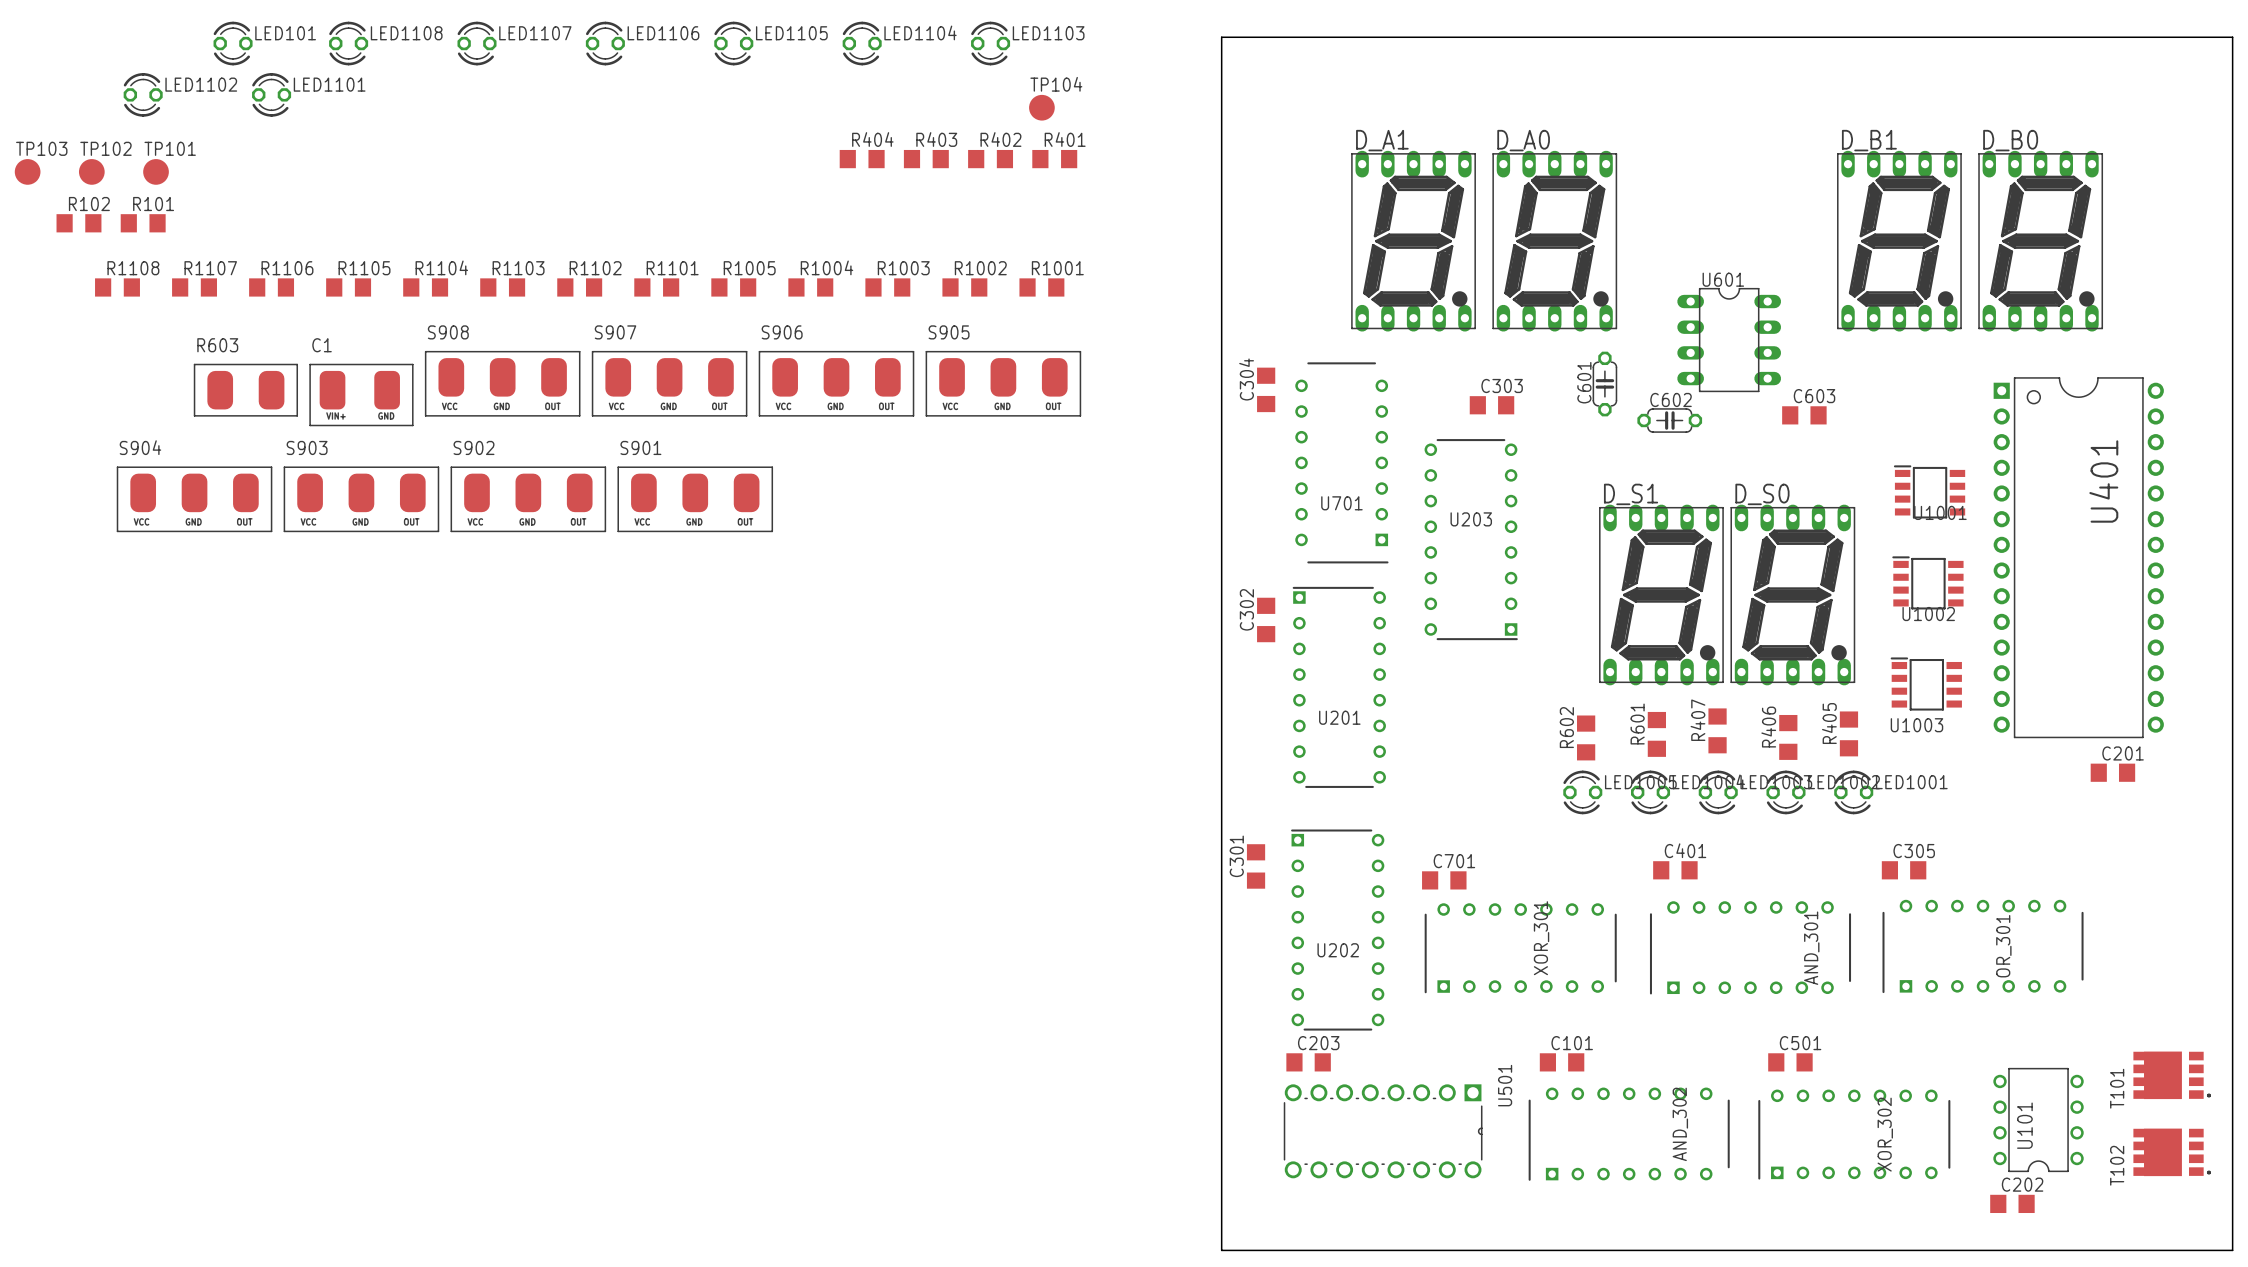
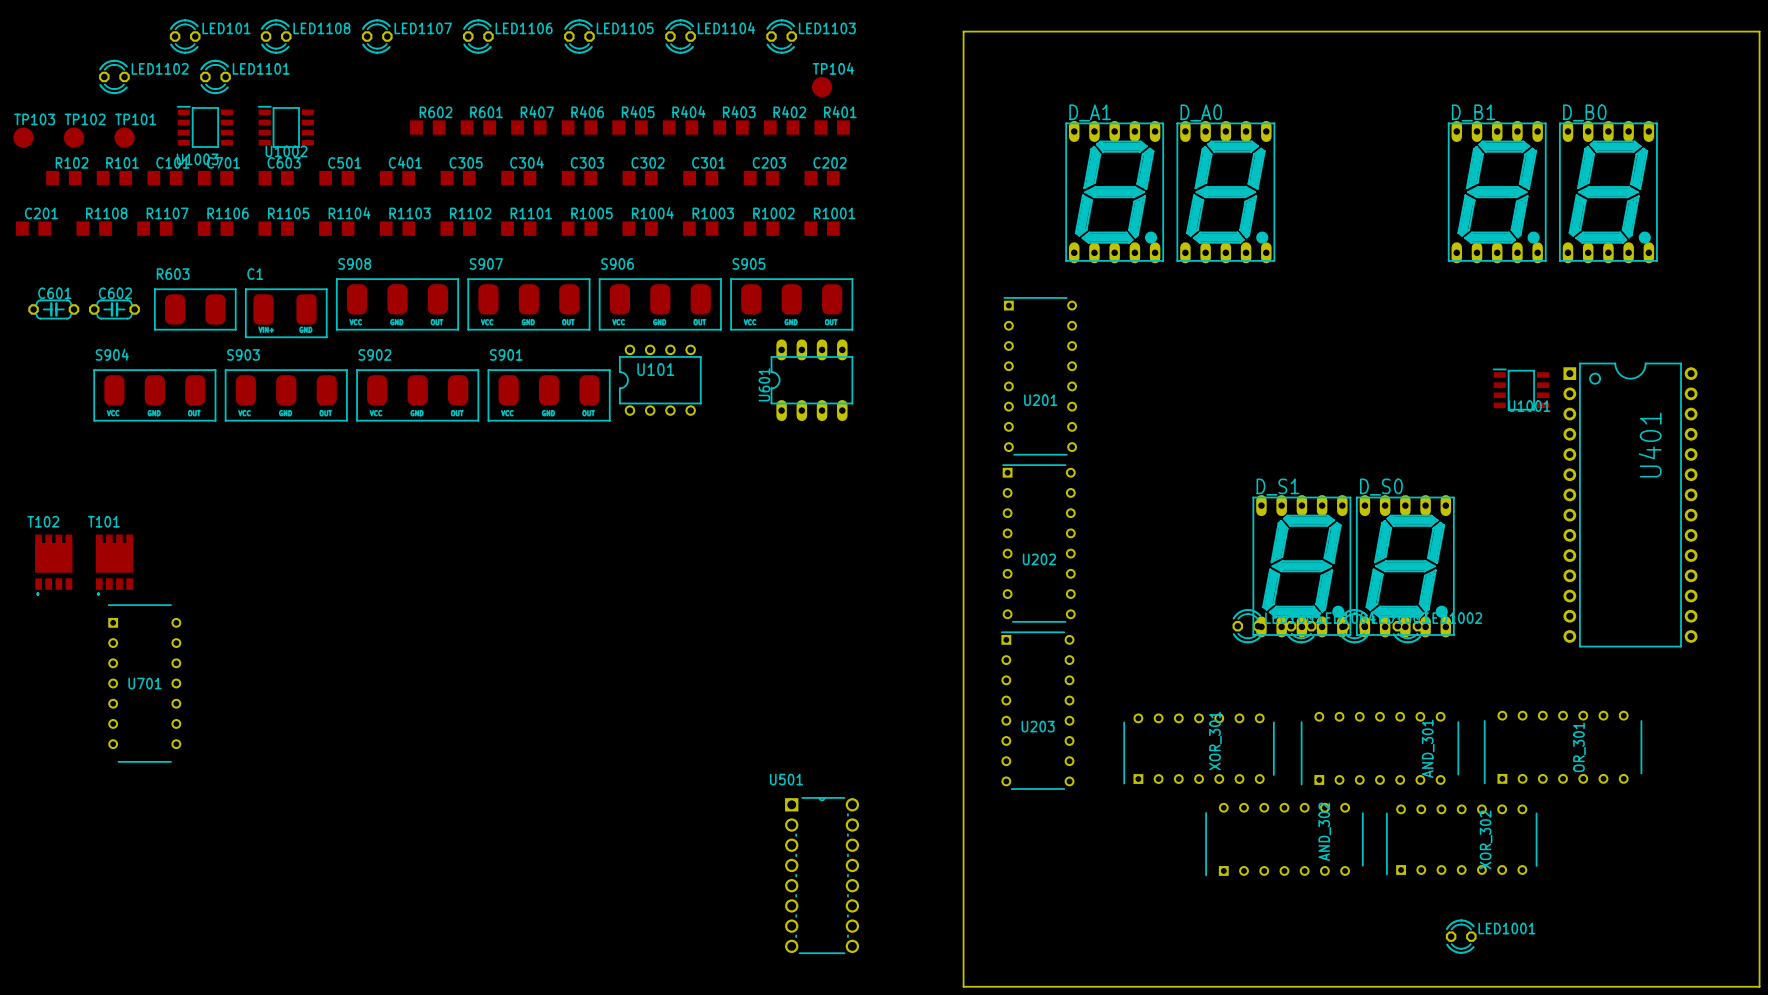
U601 rotation: 0° (1729, 340) -> 90° counterclockwise (811, 380)
U601 position: (1729, 340) -> (811, 380)
C601 rotation: 0° (1604, 384) -> 90° clockwise (53, 309)
C601 position: (1604, 384) -> (53, 309)
C304 rotation: 0° (1266, 389) -> 90° clockwise (518, 178)
C304 position: (1266, 389) -> (518, 178)
C303 position: (1492, 405) -> (579, 178)
C603 position: (1804, 415) -> (276, 178)
C602 position: (1669, 420) -> (114, 309)
U701 rotation: 0° (1341, 462) -> 180° (144, 683)
U701 position: (1341, 462) -> (144, 683)
U701 name position: U701 (1341, 503) -> U701 (144, 683)
U203 rotation: 0° (1471, 539) -> 180° (1037, 710)
U203 position: (1471, 539) -> (1037, 710)
U401 position: (2078, 557) -> (1630, 505)
U1002 position: (1927, 582) -> (285, 126)
D_S1 position: (1661, 595) -> (1301, 566)
D_S0 position: (1792, 595) -> (1405, 566)
C302 rotation: 0° (1266, 619) -> 90° clockwise (640, 178)
C302 position: (1266, 619) -> (640, 178)
U1003 position: (1926, 683) -> (205, 126)
U201 position: (1339, 687) -> (1040, 376)
R407 rotation: 0° (1717, 730) -> 90° clockwise (528, 127)
R407 position: (1717, 730) -> (528, 127)
R405 rotation: 0° (1848, 733) -> 90° clockwise (629, 127)
R405 position: (1848, 733) -> (629, 127)
R601 rotation: 0° (1656, 734) -> 90° clockwise (478, 127)
R601 position: (1656, 734) -> (478, 127)
R602 rotation: 0° (1586, 737) -> 90° clockwise (427, 127)
R602 position: (1586, 737) -> (427, 127)
R406 rotation: 0° (1788, 737) -> 90° clockwise (579, 127)
R406 position: (1788, 737) -> (579, 127)
C201 position: (2112, 772) -> (33, 228)
LED1001 position: (1853, 792) -> (1461, 936)
C301 rotation: 0° (1256, 866) -> 90° clockwise (700, 178)
C301 position: (1256, 866) -> (700, 178)
C401 position: (1675, 870) -> (397, 178)
C305 position: (1904, 870) -> (458, 178)
C701 position: (1444, 880) -> (215, 178)
U202 position: (1337, 930) -> (1039, 543)
C203 position: (1308, 1062) -> (761, 178)
C101 position: (1562, 1062) -> (164, 178)
C501 position: (1790, 1062) -> (336, 178)
T101 rotation: 0° (2172, 1075) -> 90° clockwise (114, 565)
T101 position: (2172, 1075) -> (114, 565)
U101 rotation: 0° (2038, 1119) -> 90° clockwise (660, 380)
U101 position: (2038, 1119) -> (660, 380)
U501 rotation: 0° (1383, 1131) -> 90° counterclockwise (822, 875)
U501 position: (1383, 1131) -> (822, 875)
AND_302 position: (1629, 1134) -> (1284, 839)
XOR_302 position: (1854, 1134) -> (1461, 839)
T102 rotation: 0° (2172, 1152) -> 90° clockwise (53, 565)
T102 position: (2172, 1152) -> (53, 565)
C202 position: (2012, 1203) -> (822, 178)

